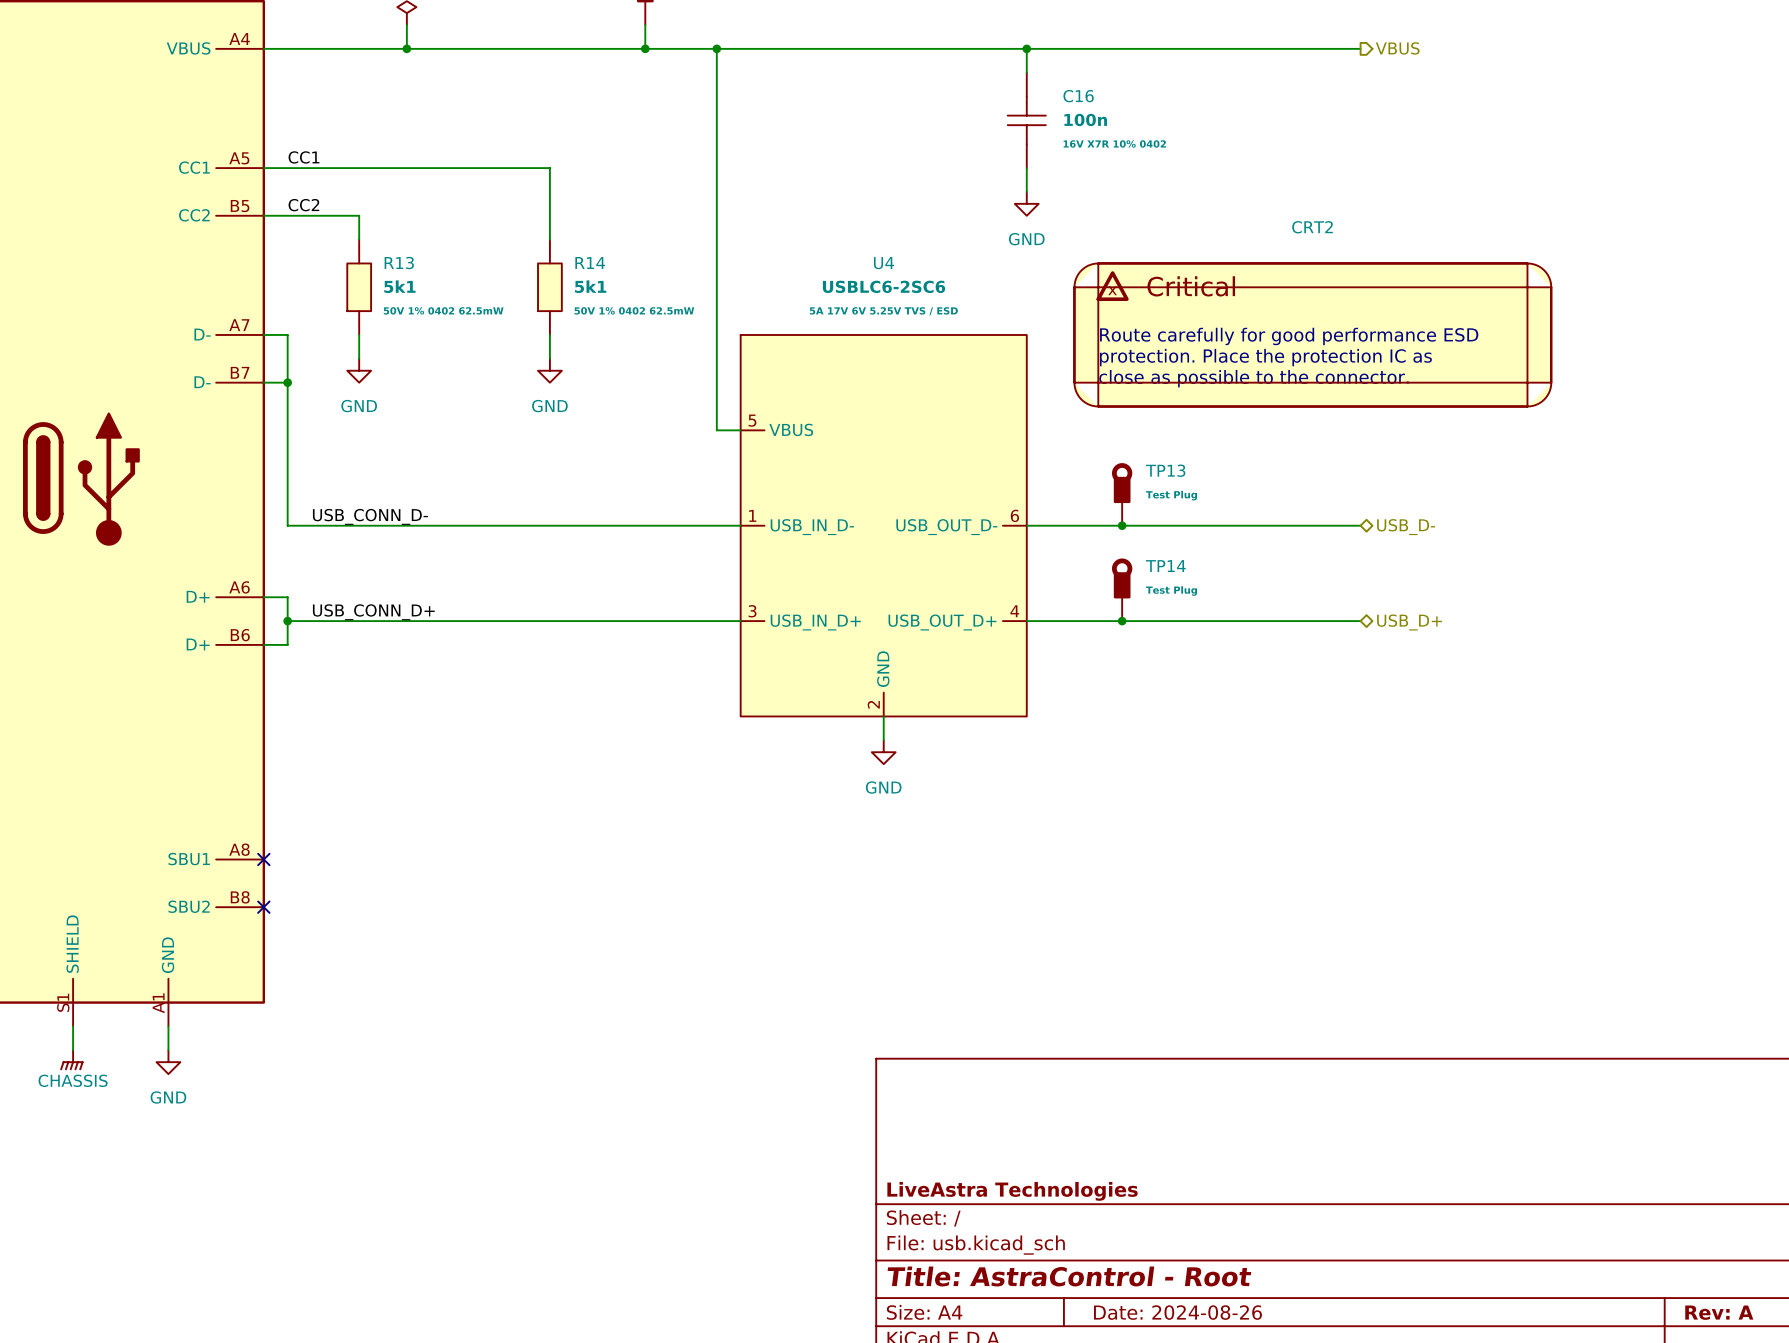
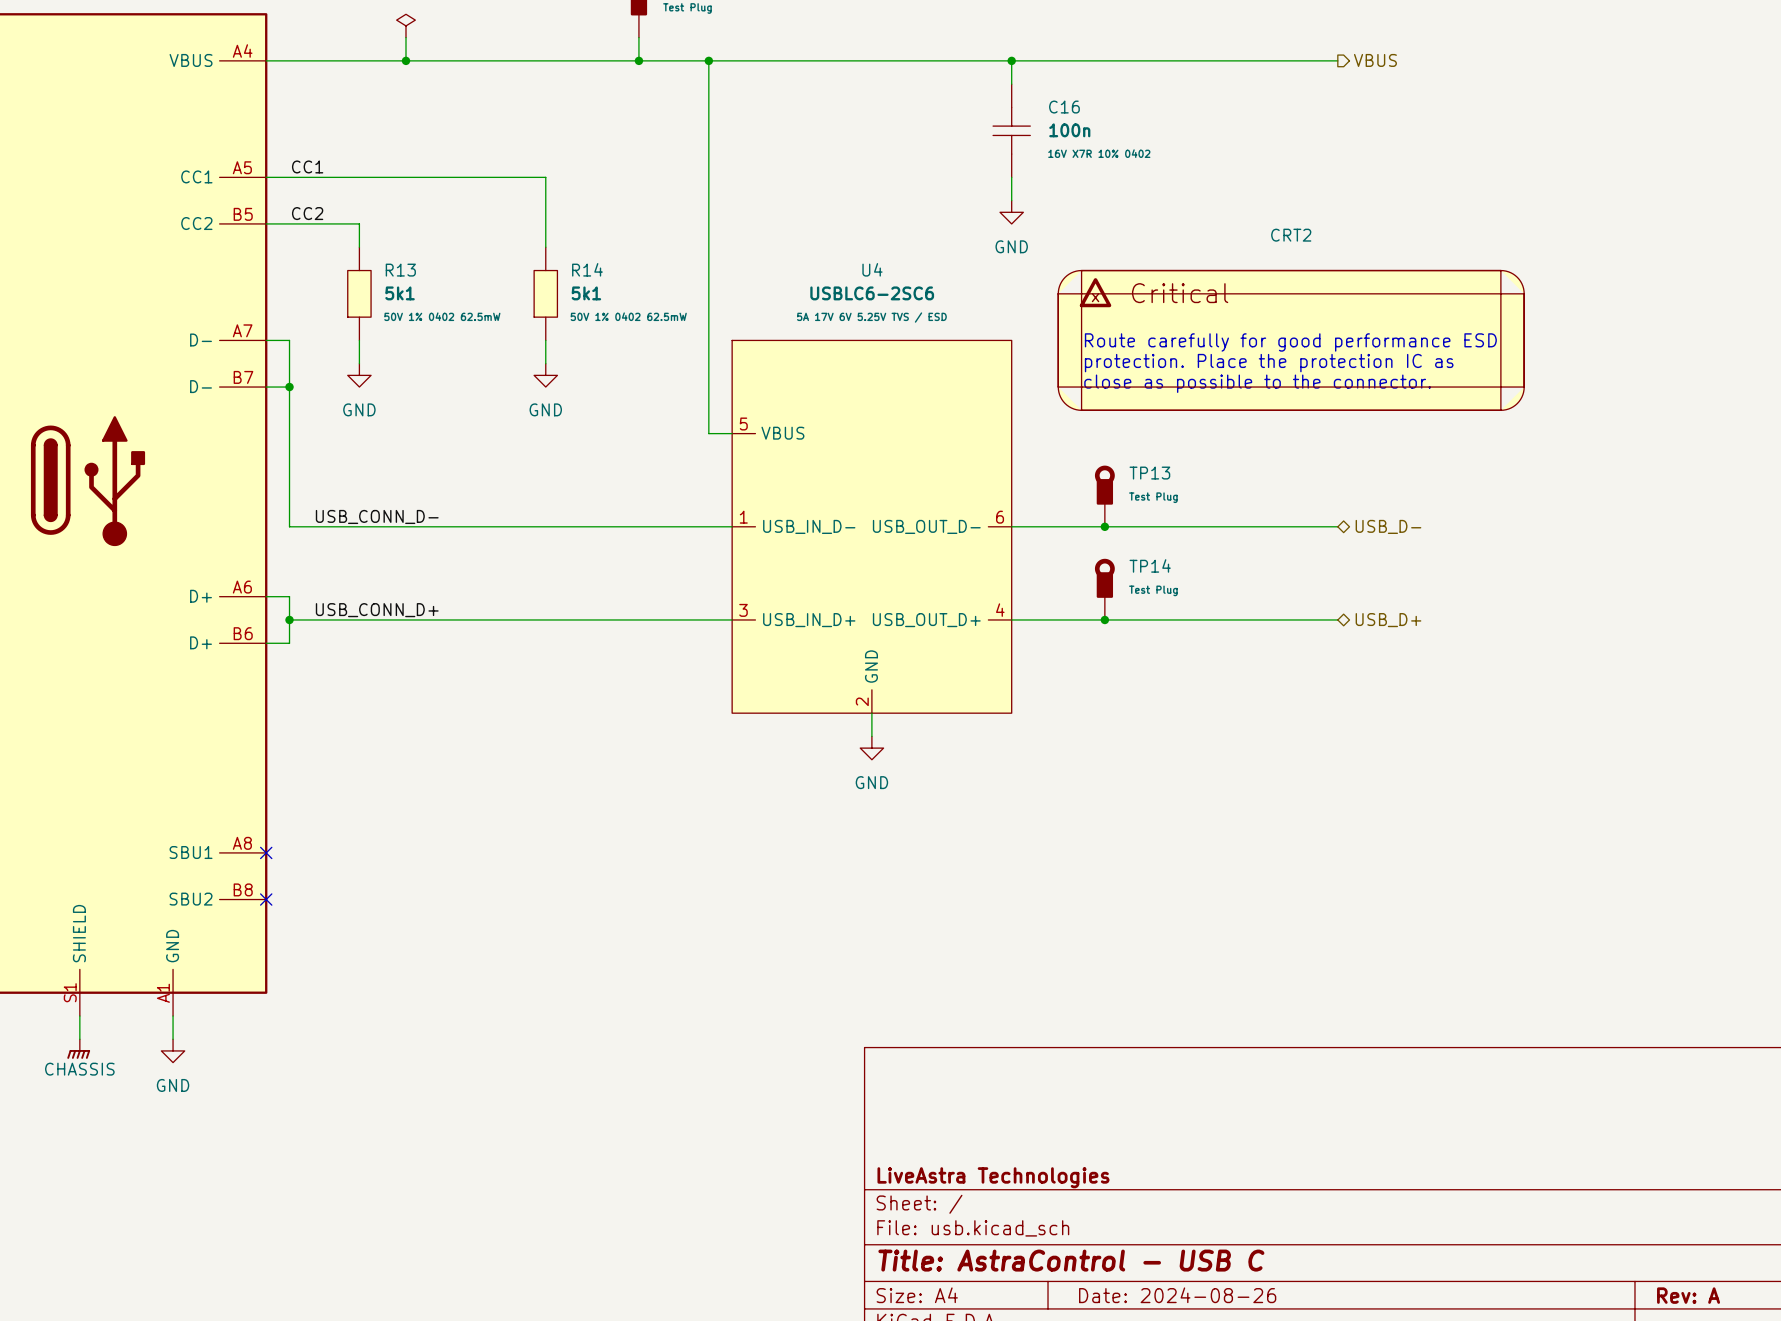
title block: Title: AstraControl - Root (1069, 1276) -> Title: AstraControl - USB C (1071, 1260)

